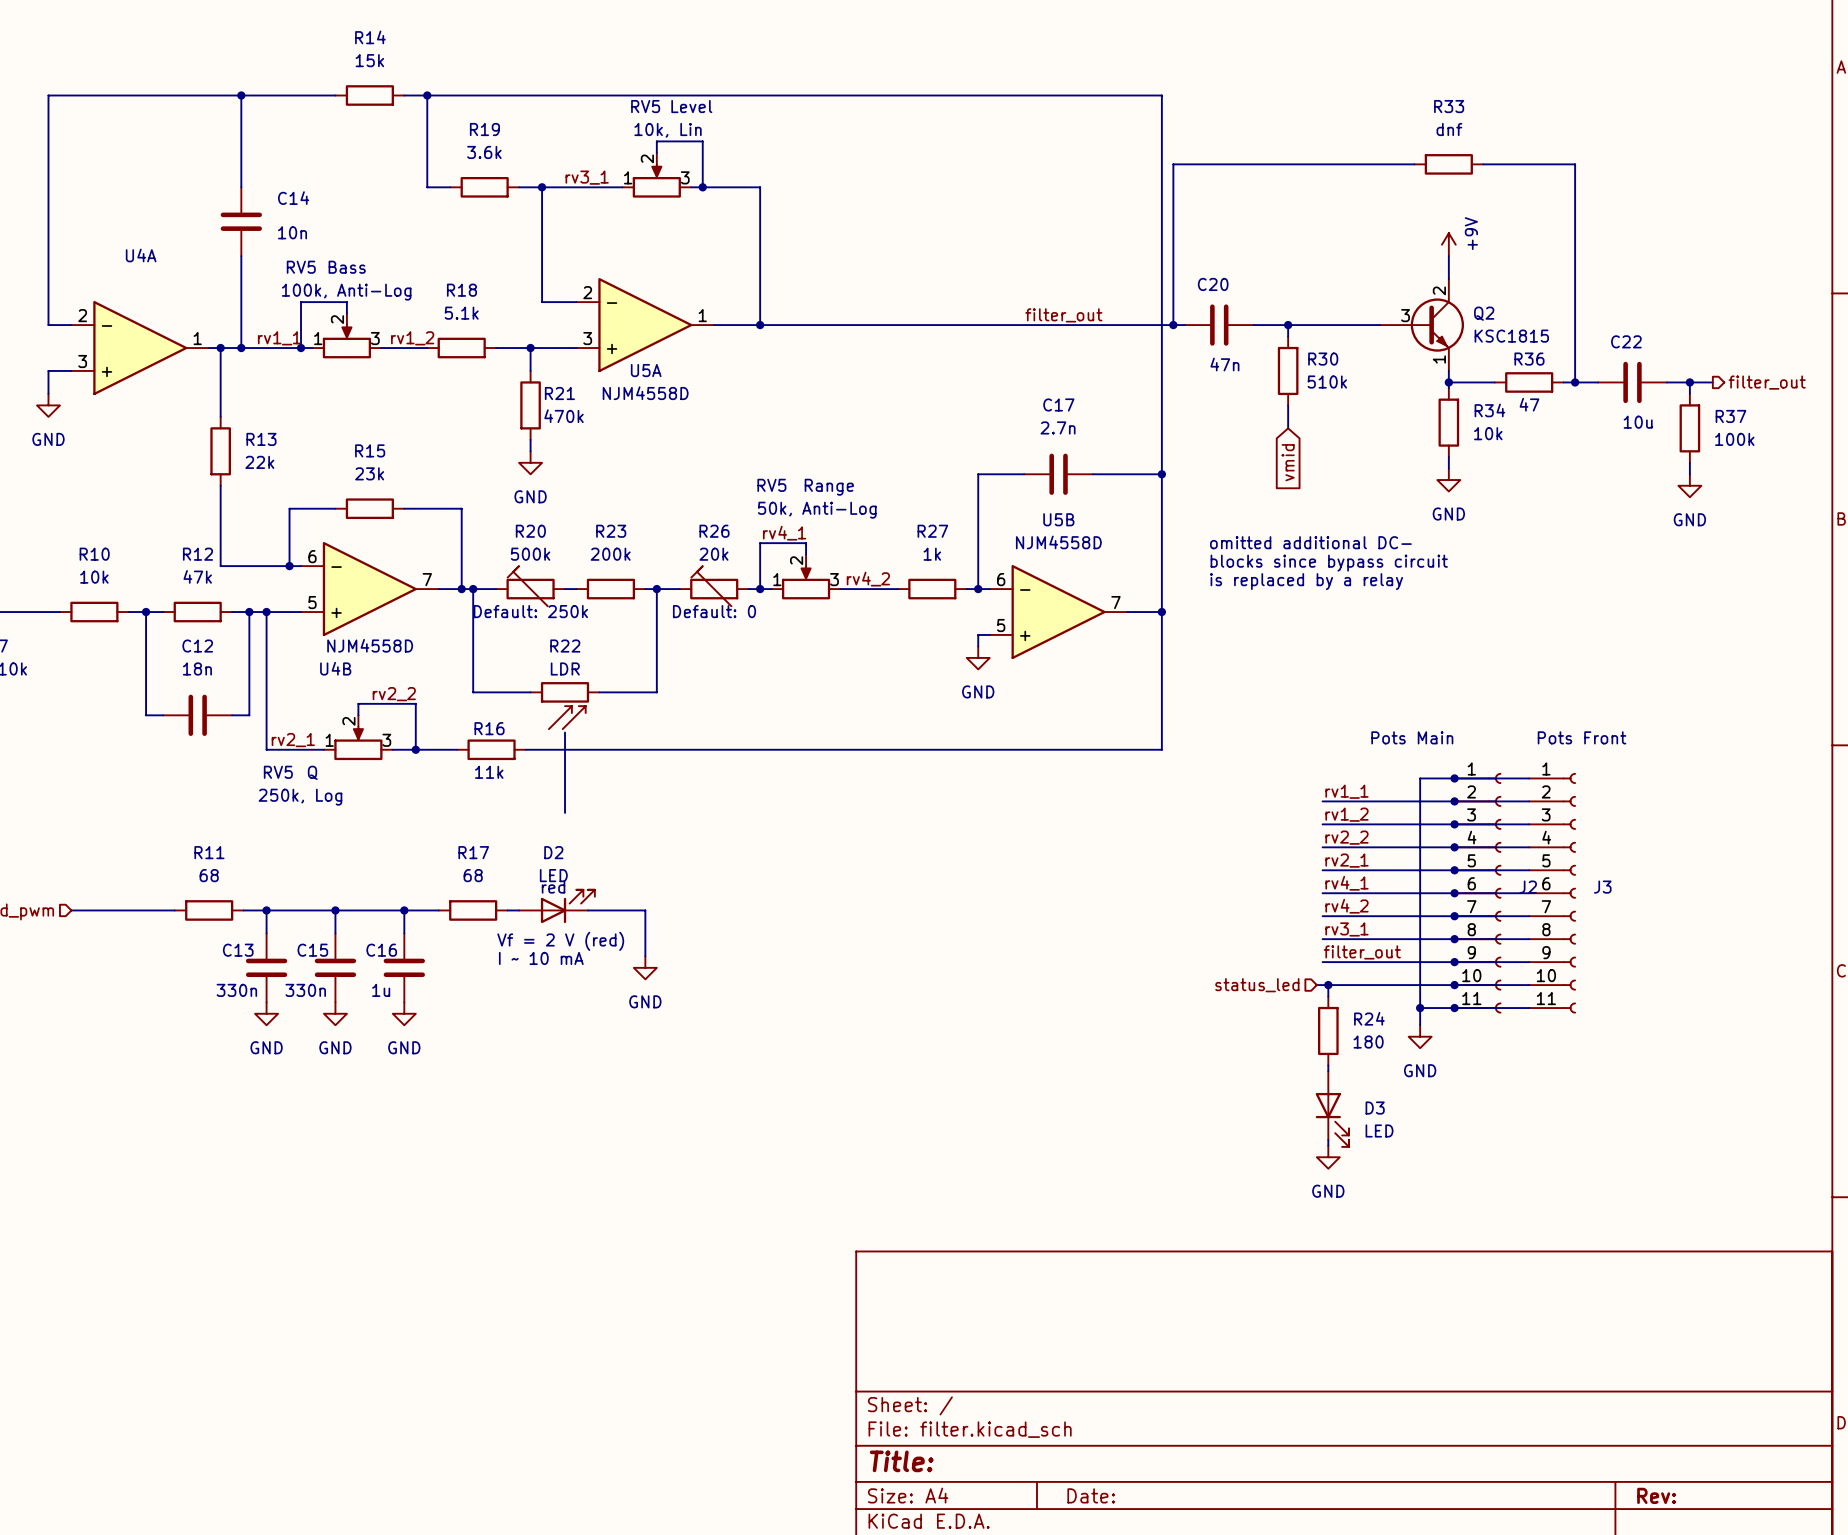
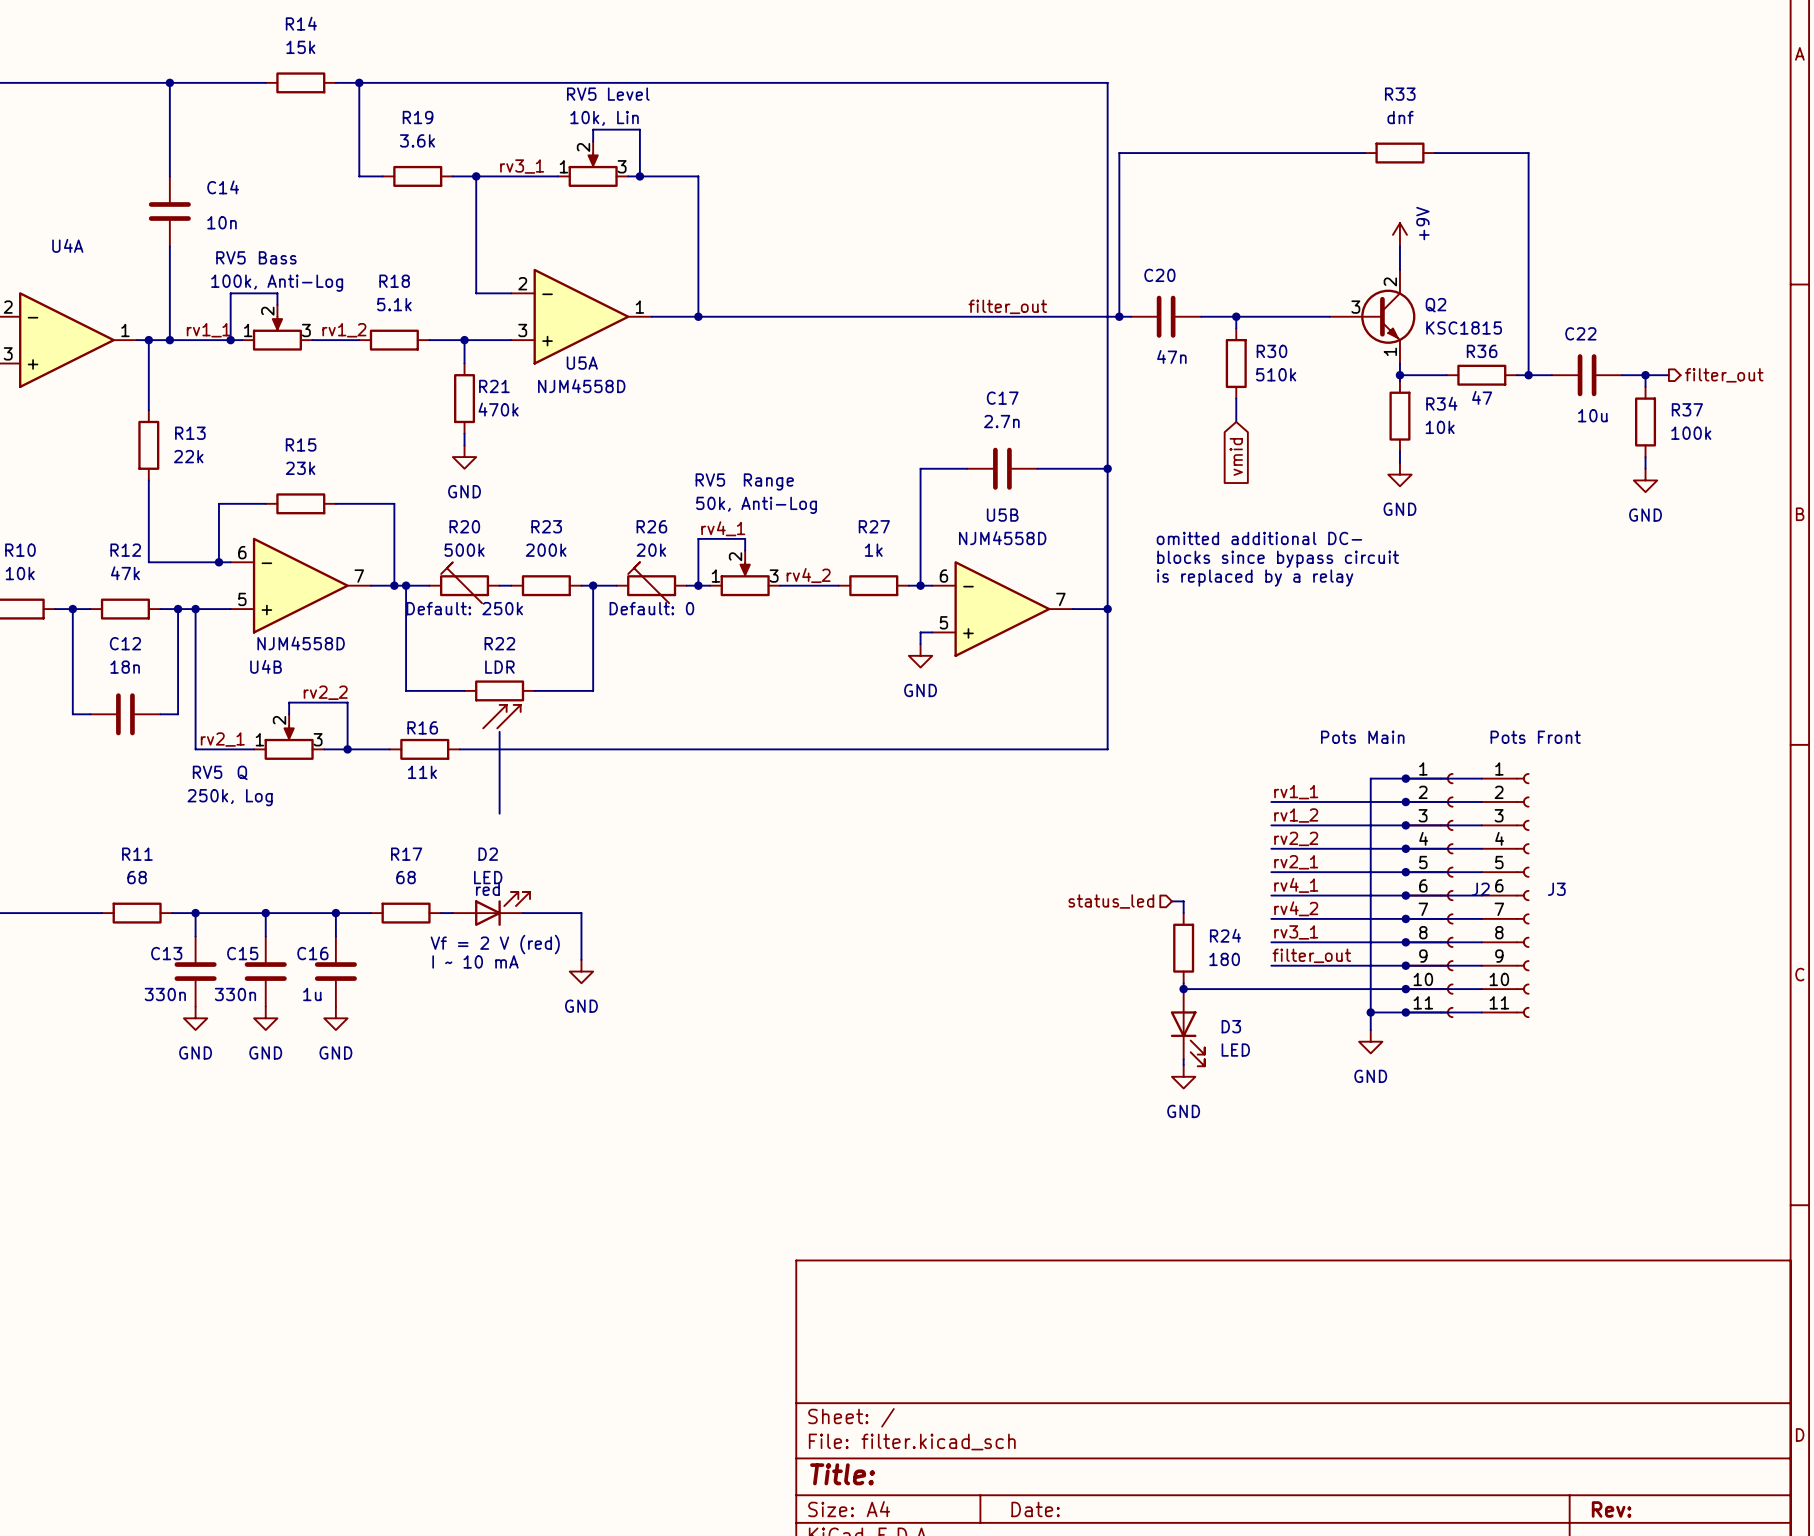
wire: none -> (1171, 901) (1183, 901) (1183, 913)
wire: none -> (1183, 983) (1183, 989) (1265, 989)
junction: none -> (1183, 989)
hierarchical label position: status_led (1257, 985) -> status_led (1111, 901)
wire: (1328, 985) (1328, 996) -> none
junction: (1328, 985) -> none
R24 position: (1328, 1030) -> (1183, 948)
wire: (1328, 1065) (1328, 1071) -> (1183, 1059) (1183, 1065)
D3 position: (1332, 1109) -> (1187, 1027)
wire: (1328, 1140) (1328, 1145) -> none
power symbol position: GND (1328, 1157) -> GND (1183, 1076)

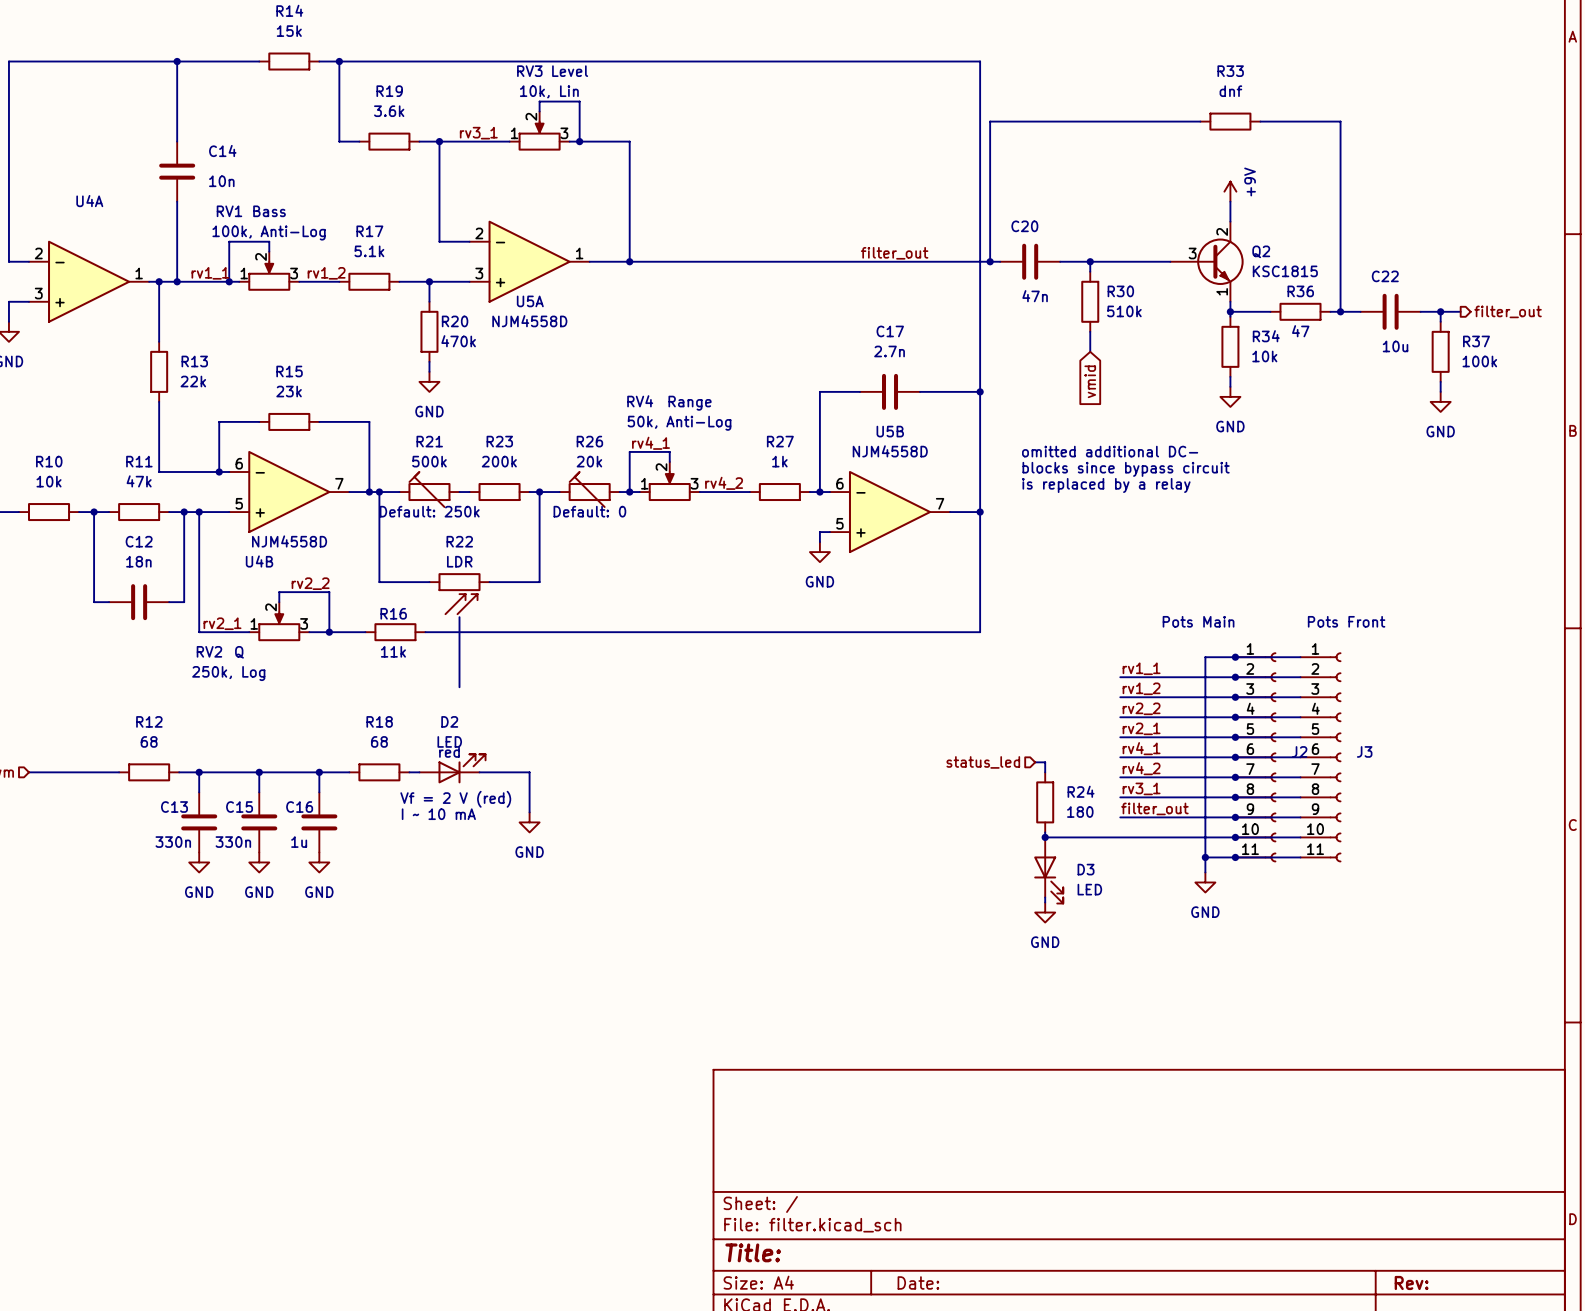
RV5 name: RV5 (581, 94) -> RV3 (529, 71)
RV5 name: RV5 (230, 257) -> RV1 (229, 211)
R18 name: R18 (394, 281) -> R17 (369, 231)
R21 name: R21 (494, 386) -> R20 (455, 321)
RV5 name: RV5 (710, 480) -> RV4 (640, 401)
R20 name: R20 (464, 526) -> R21 (429, 441)
R12 name: R12 (125, 550) -> R11 (139, 461)
RV5 name: RV5 (207, 772) -> RV2 (209, 651)
R11 name: R11 (137, 854) -> R12 (149, 721)
R17 name: R17 (406, 854) -> R18 (379, 721)

